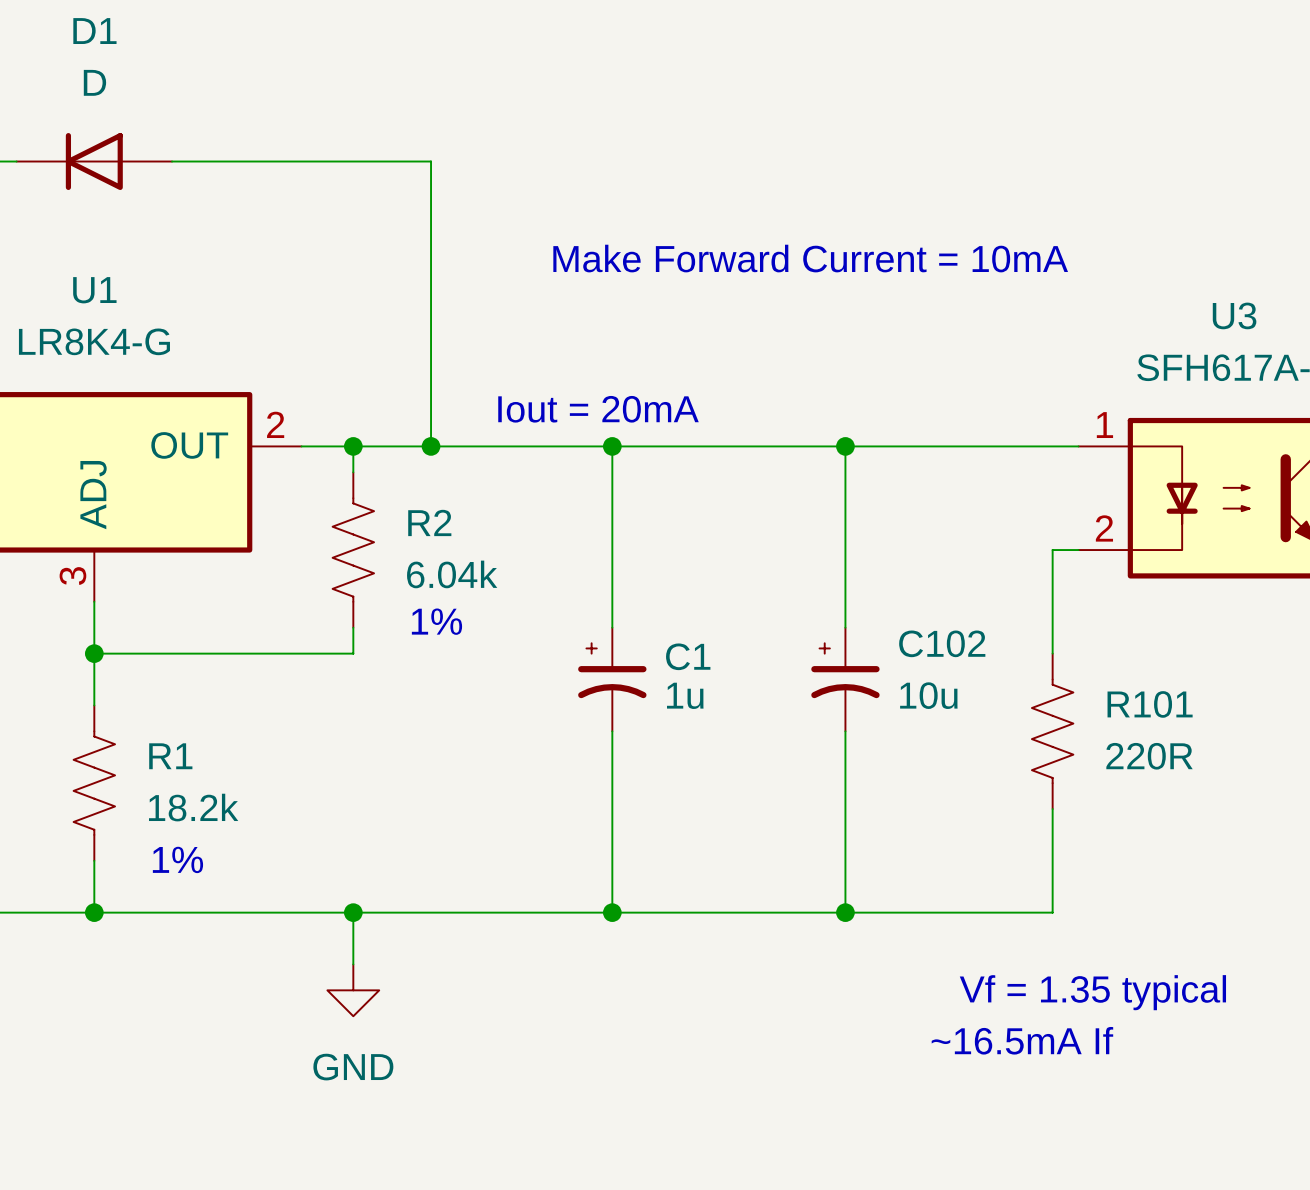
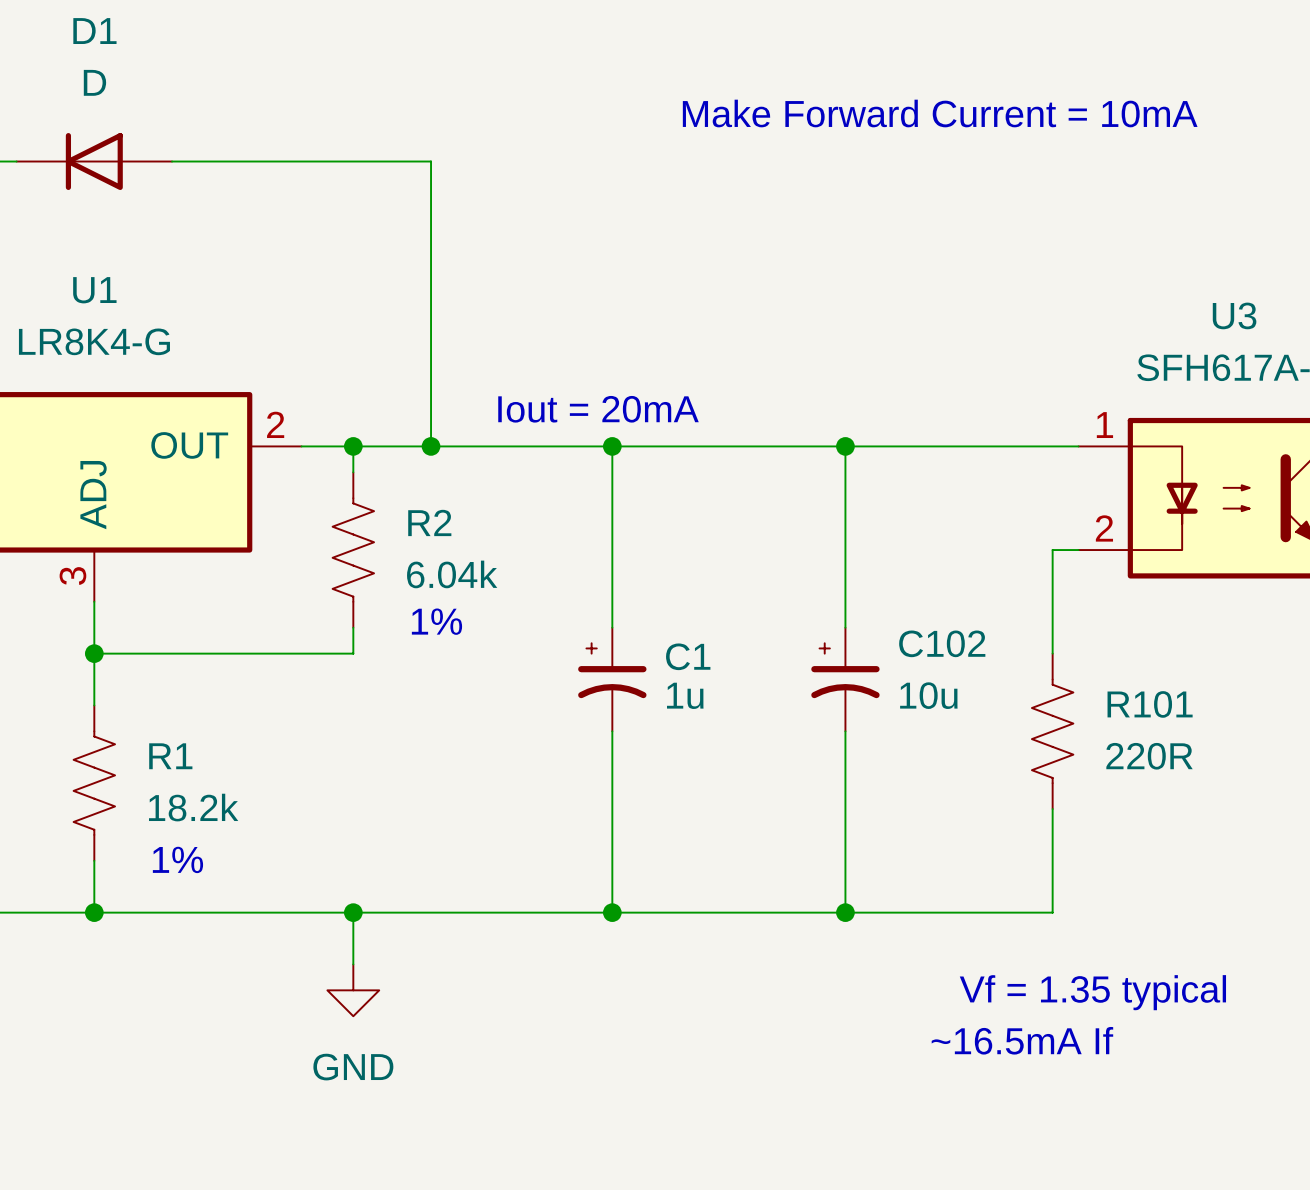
text position: Make Forward Current = 10mA (810, 258) -> Make Forward Current = 10mA (940, 113)

